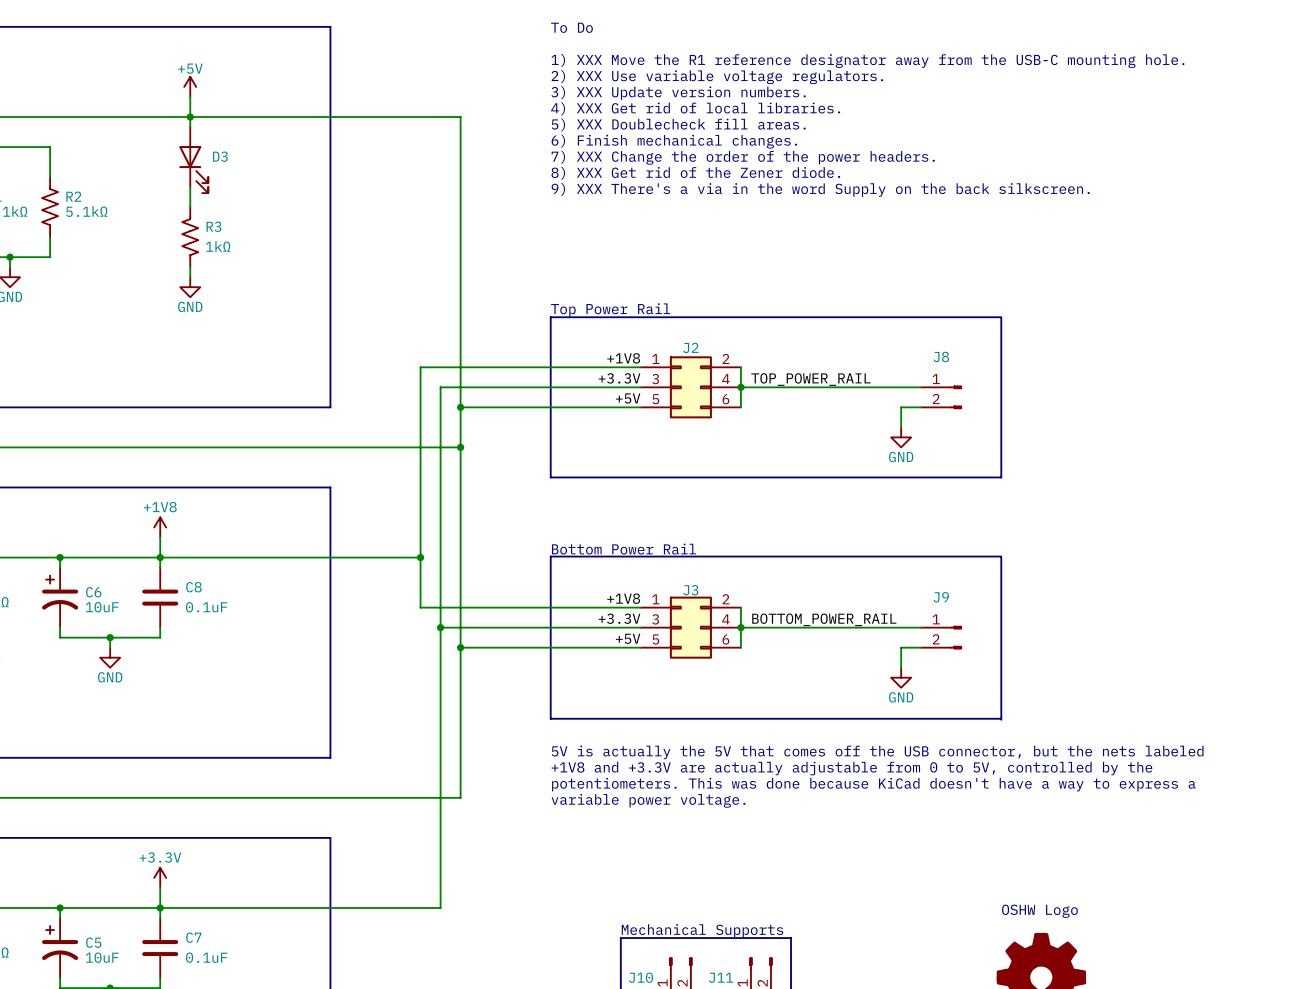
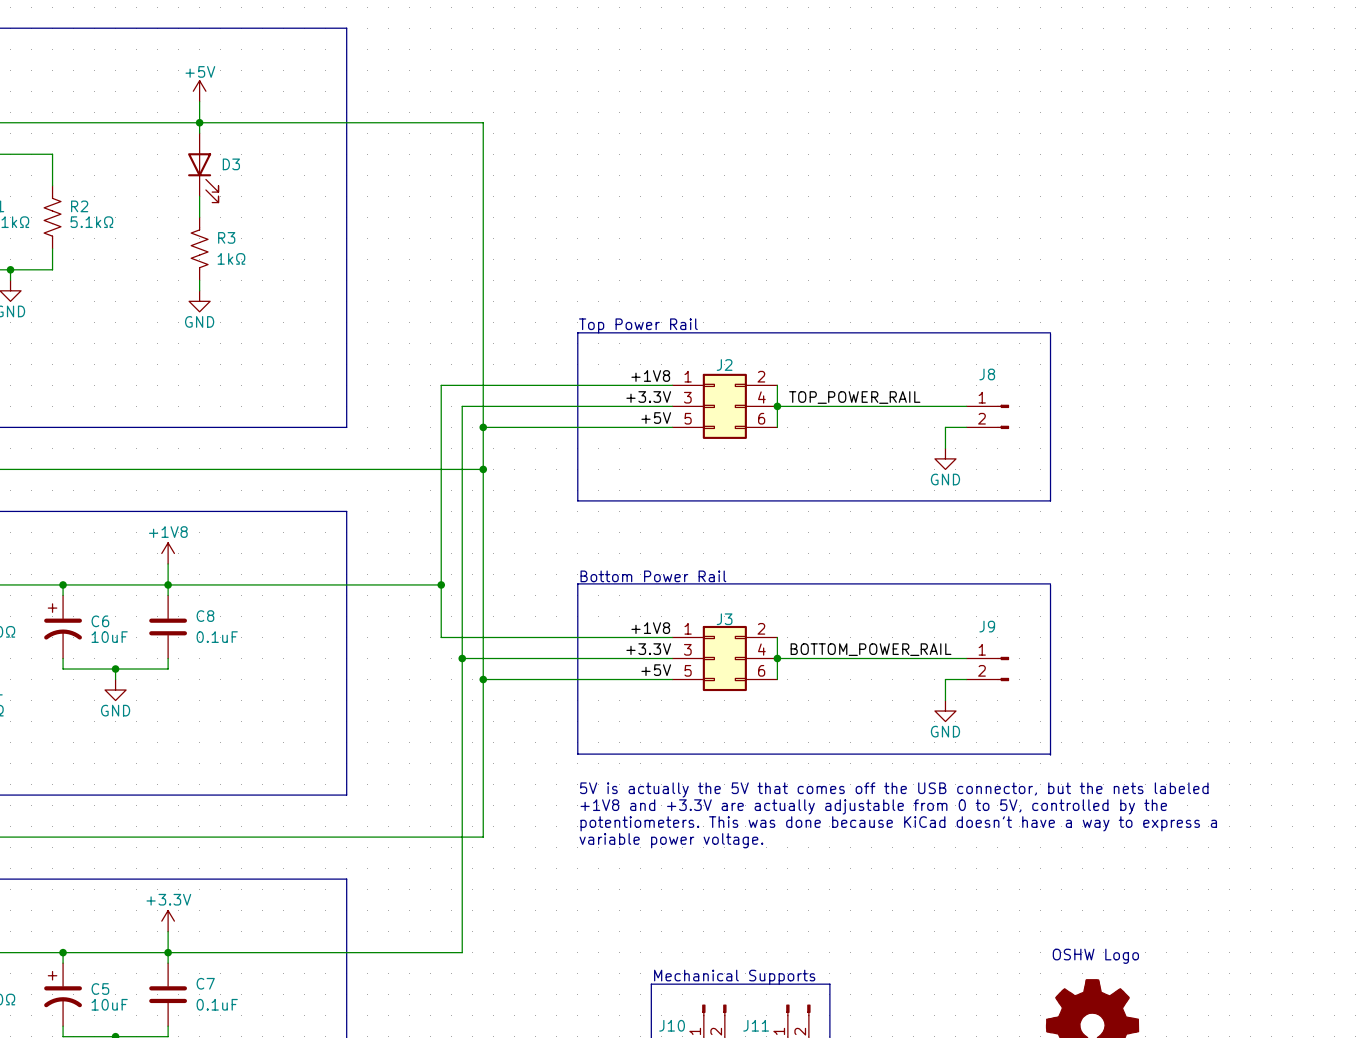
text: To Do (571, 27) -> none
text: 1) XXX Move the R1 reference designator away from the USB-C mounting hole. (867, 61) -> none
text: 2) XXX Use variable voltage regulators. (717, 77) -> none
text: 3) XXX Update version numbers. (678, 93) -> none
text: 4) XXX Get rid of local libraries. (695, 108) -> none
text: 5) XXX Doublecheck fill areas. (678, 124) -> none
text: 6) Finish mechanical changes. (674, 141) -> none
text: 7) XXX Change the order of the power headers. (743, 157) -> none
text: 8) XXX Get rid of the Zener diode. (695, 173) -> none
text: 9) XXX There's a via in the word Supply on the back silkscreen. (820, 189) -> none

